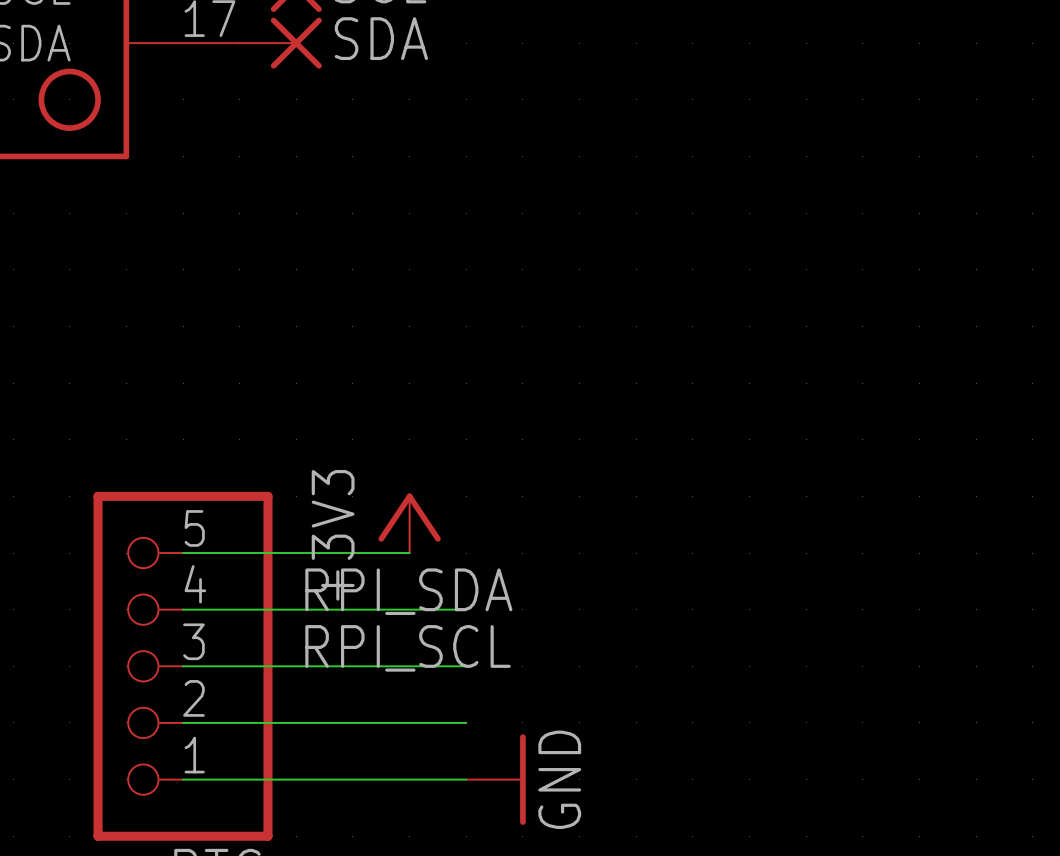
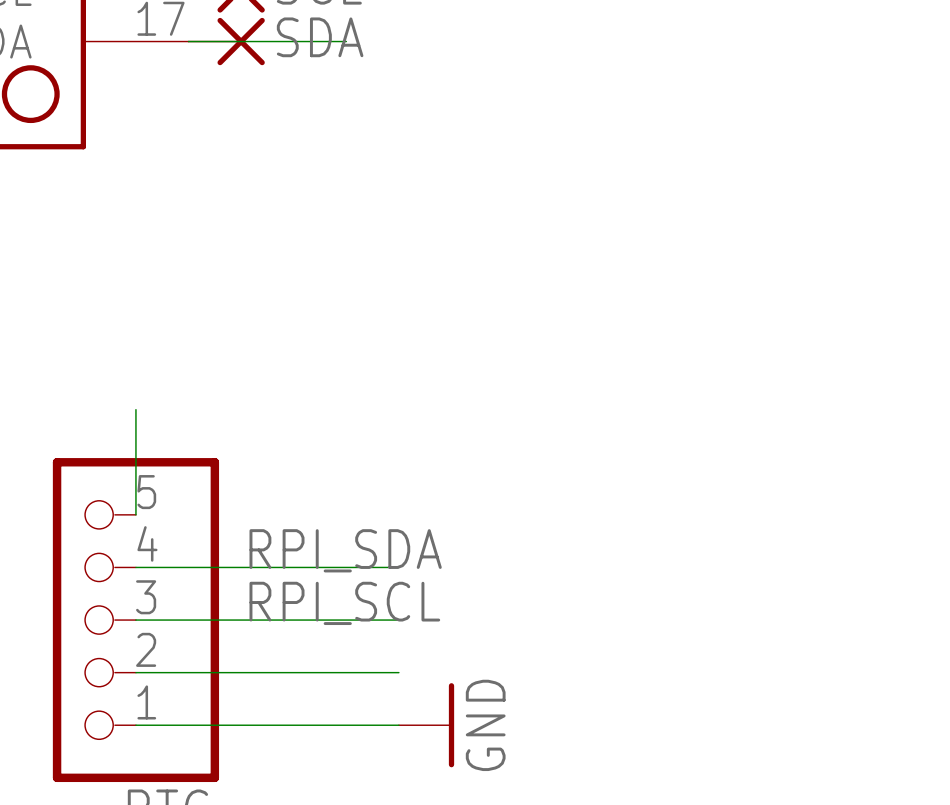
wire: none -> (188, 41) (346, 41)
power symbol: +3V3 (409, 523) -> none
wire: (183, 553) (409, 553) -> (135, 514) (135, 409)

